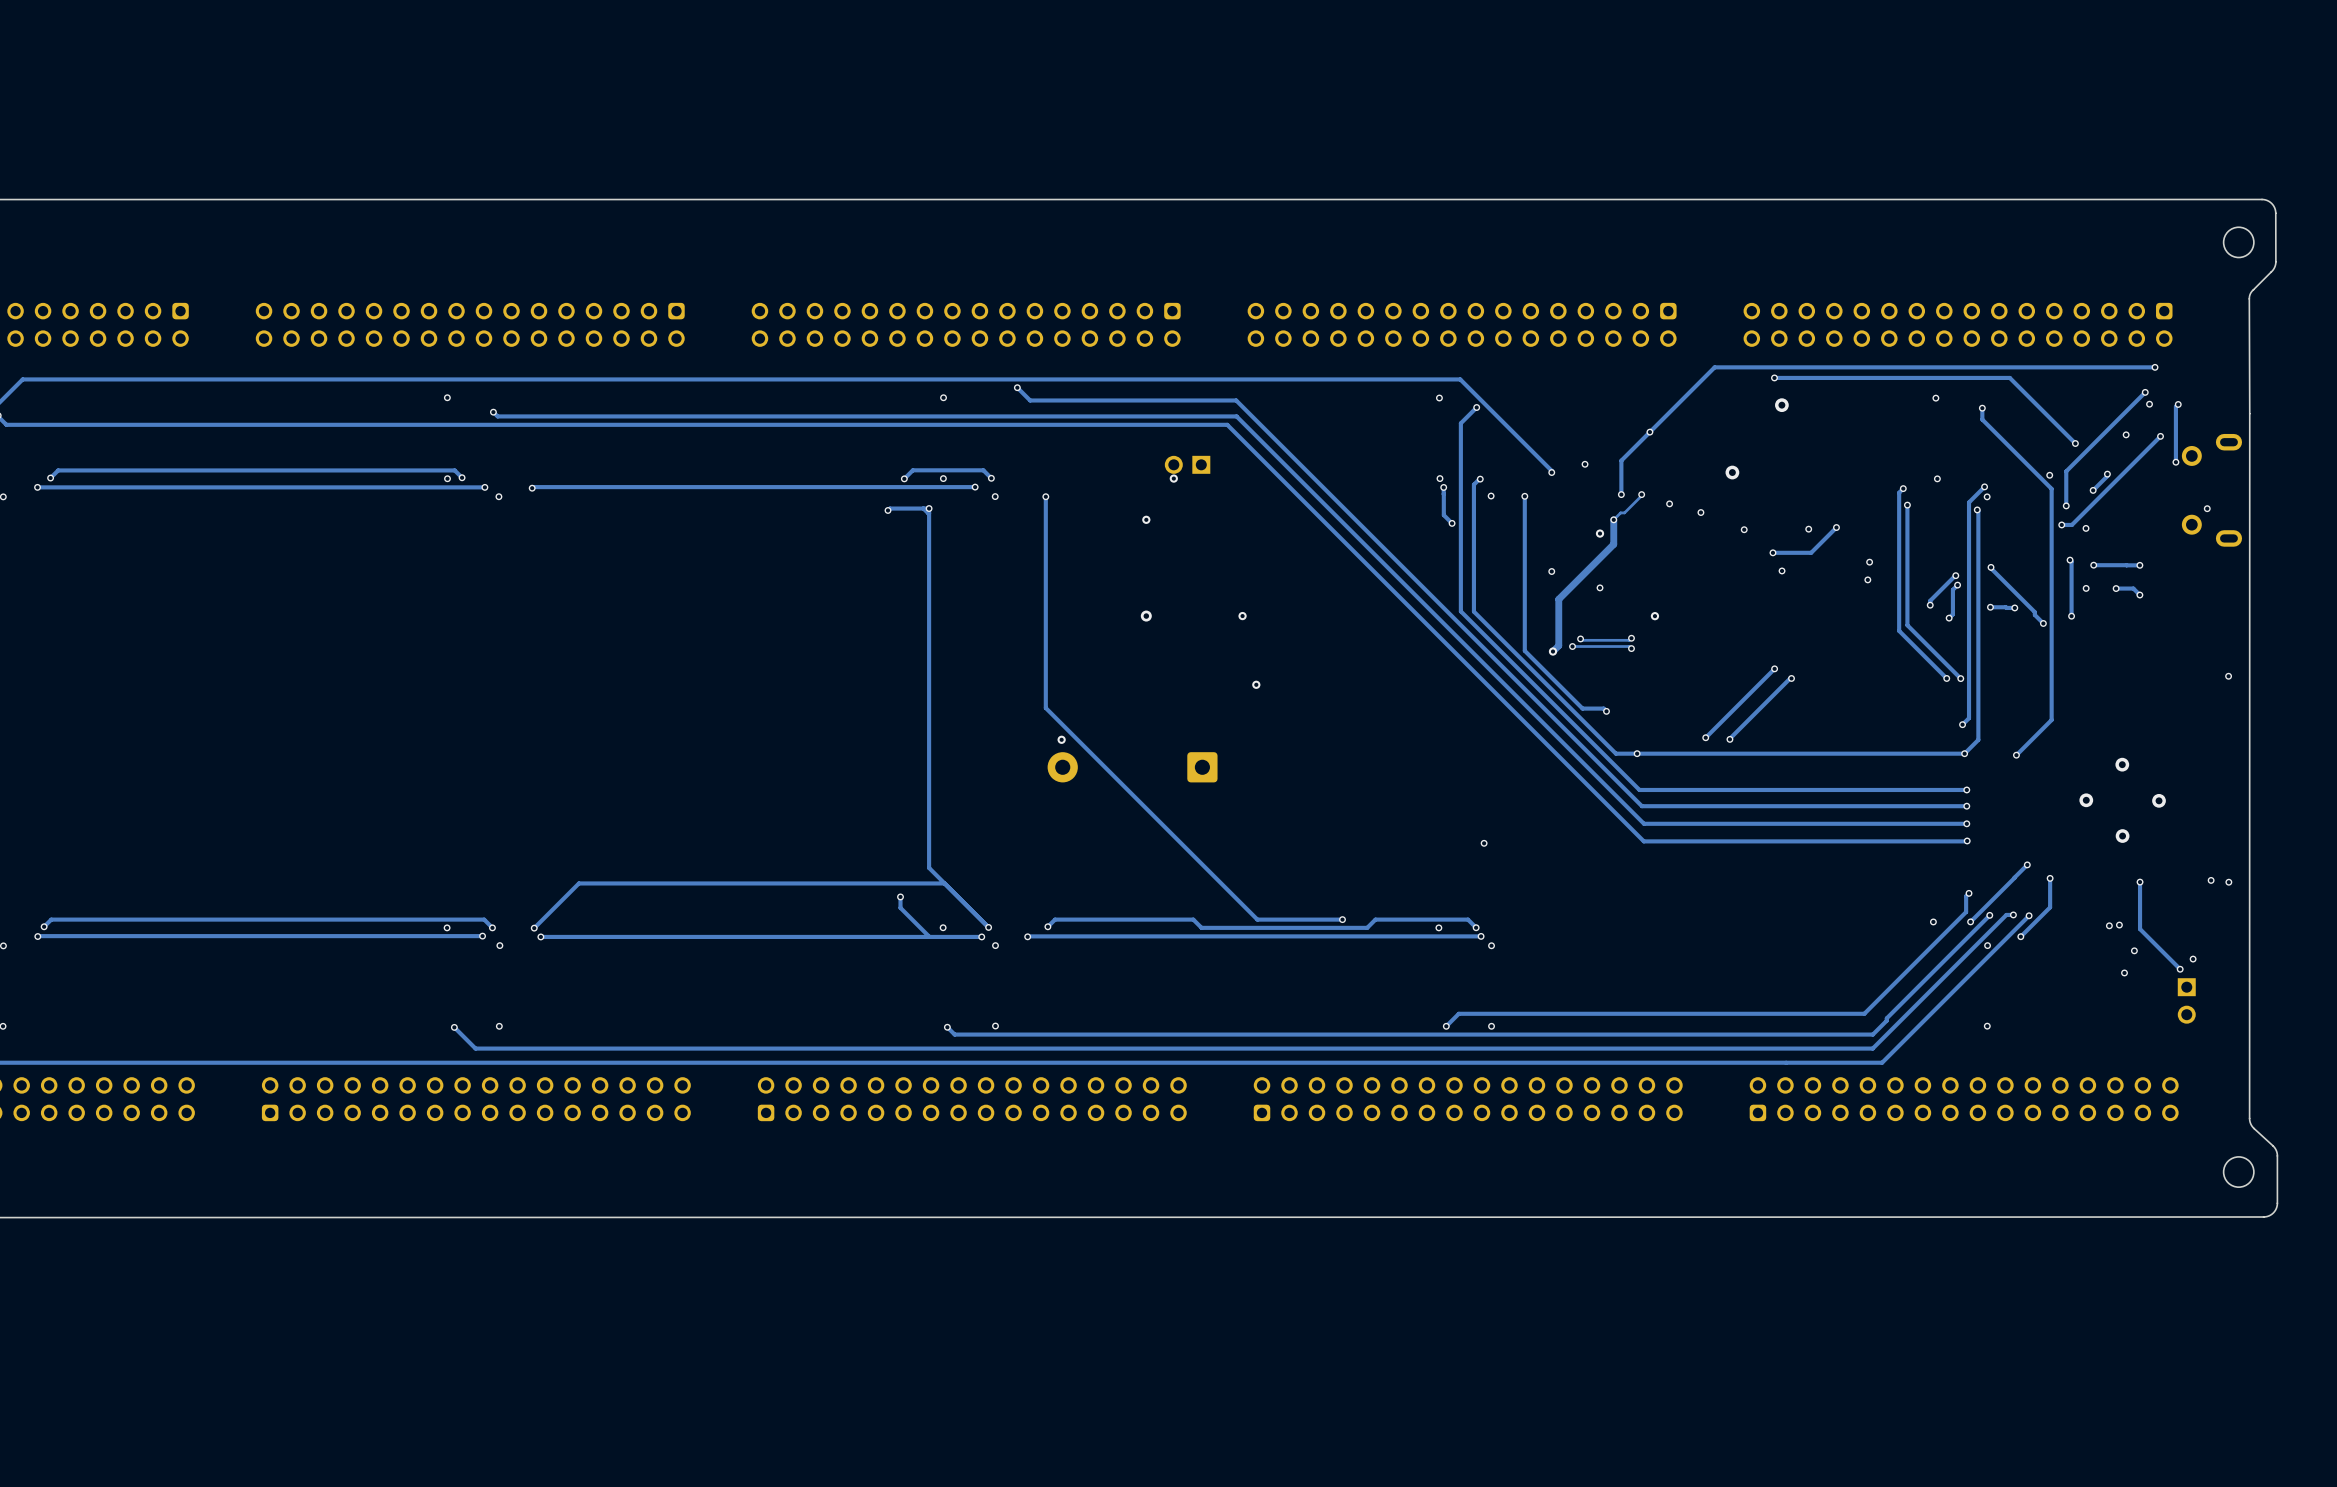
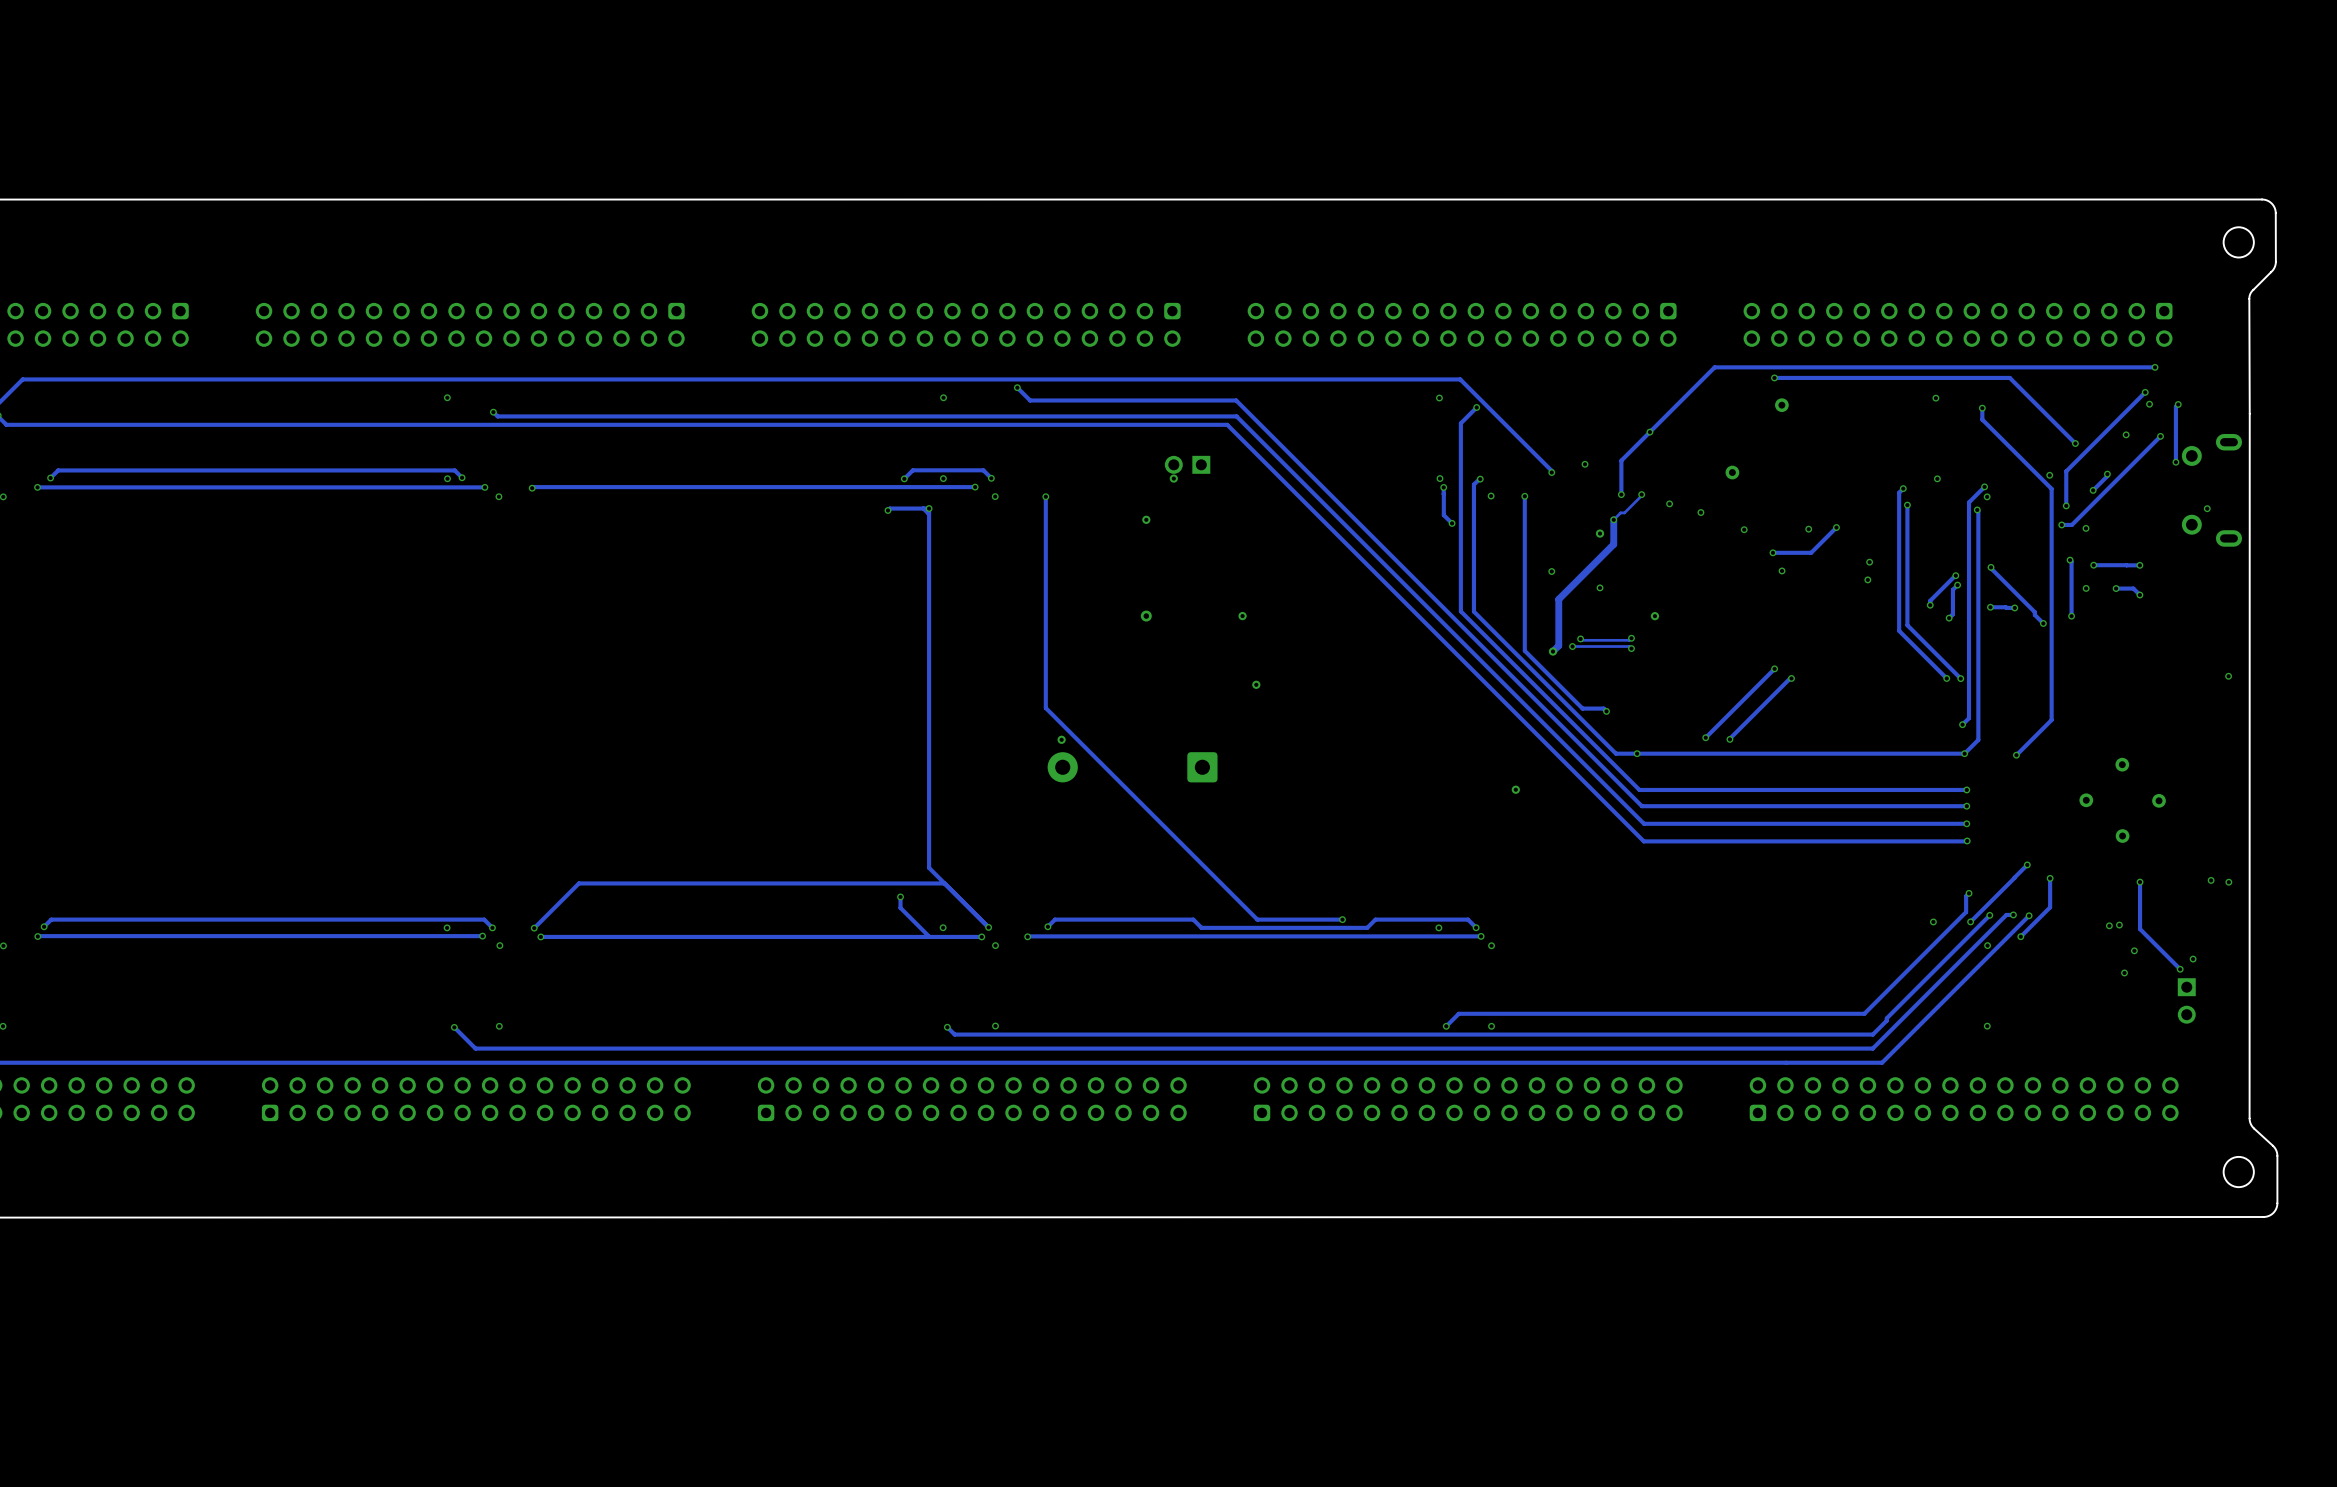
via: none -> (1515, 789)
via: (1484, 843) -> none

